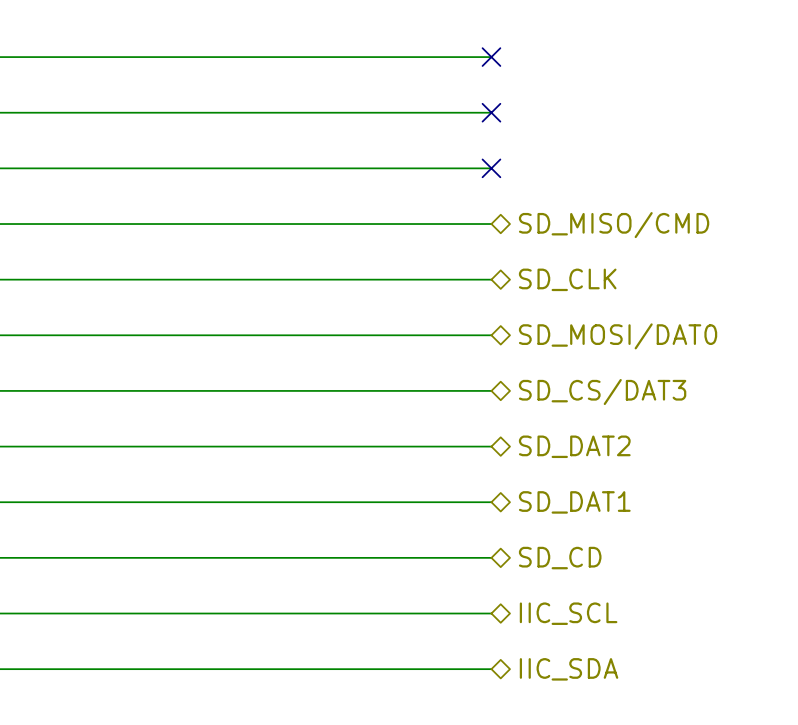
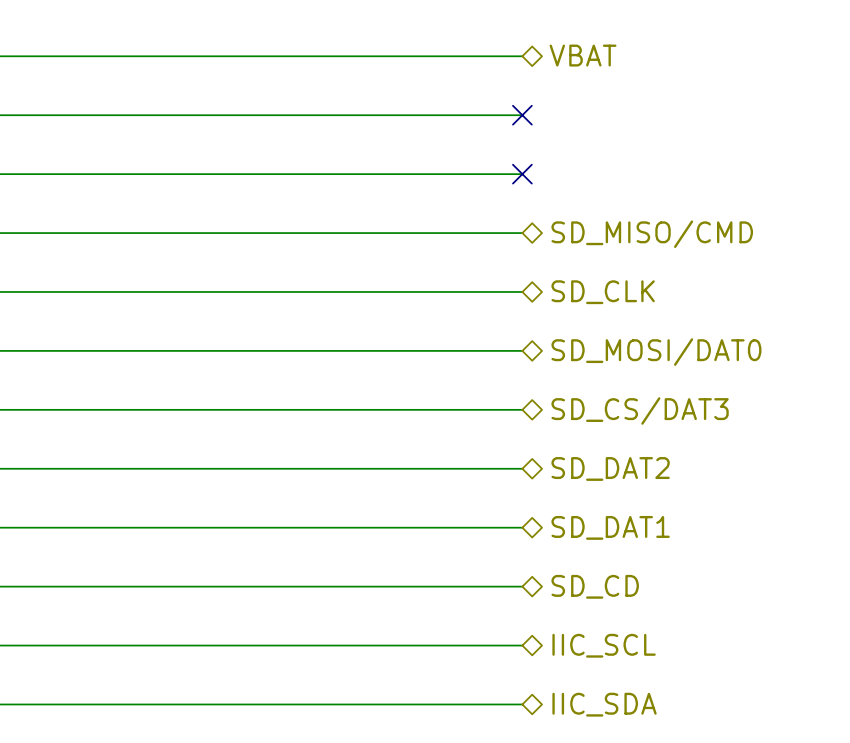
hierarchical label: none -> VBAT (583, 55)
no-connect mark: (491, 57) -> none

